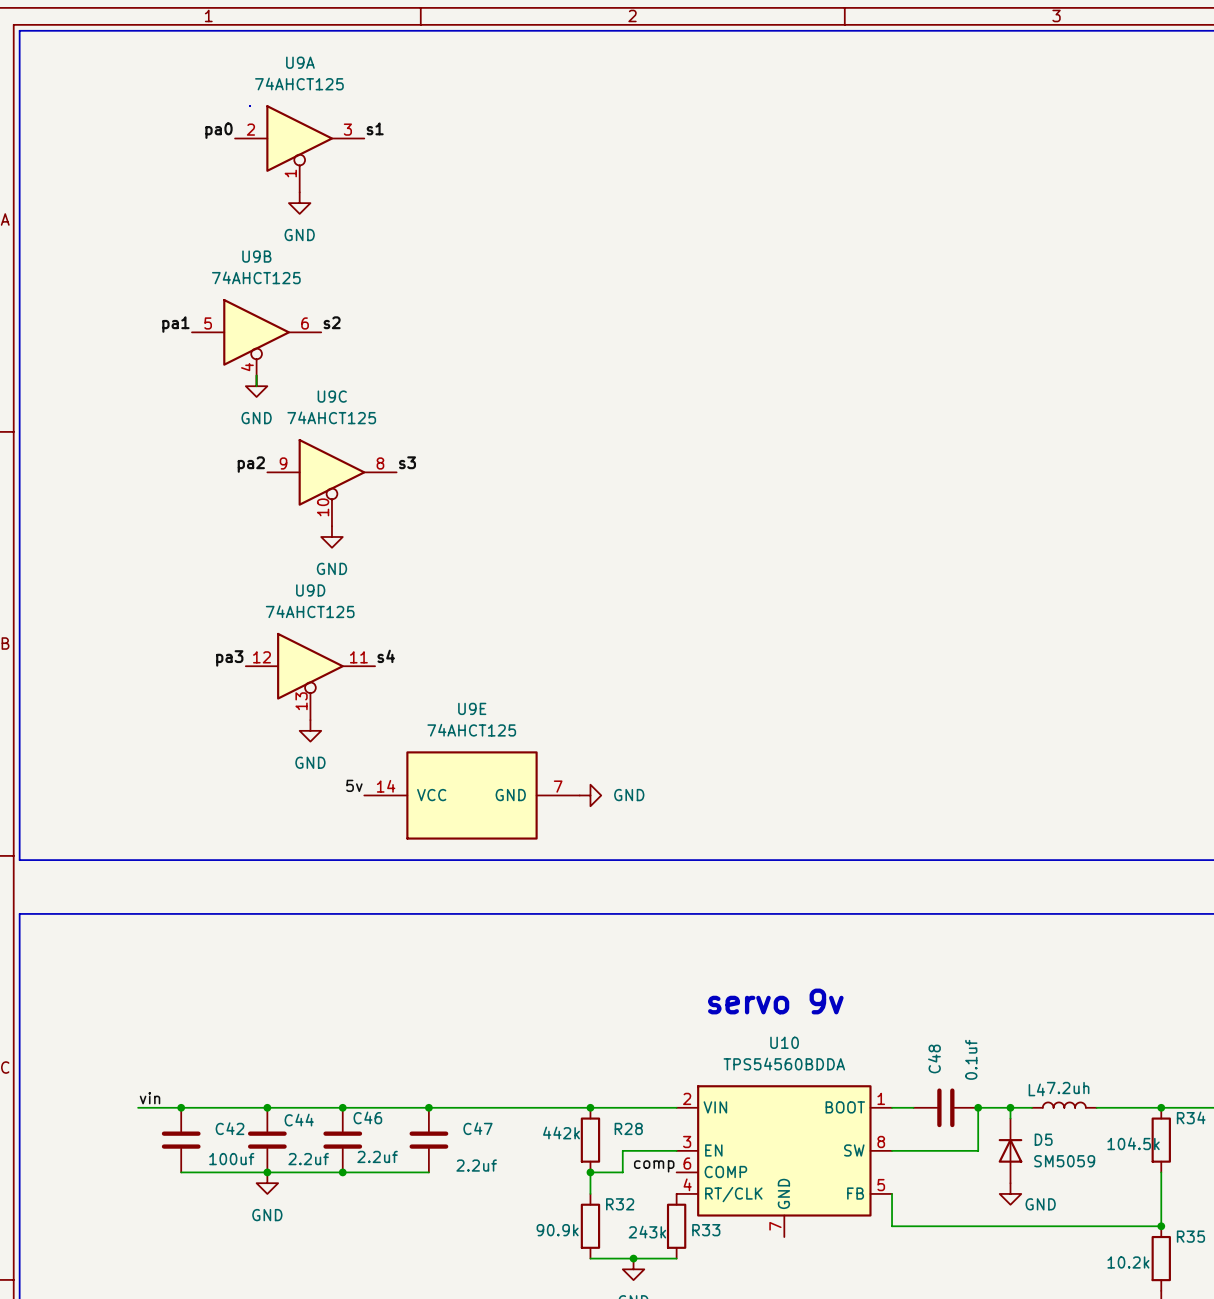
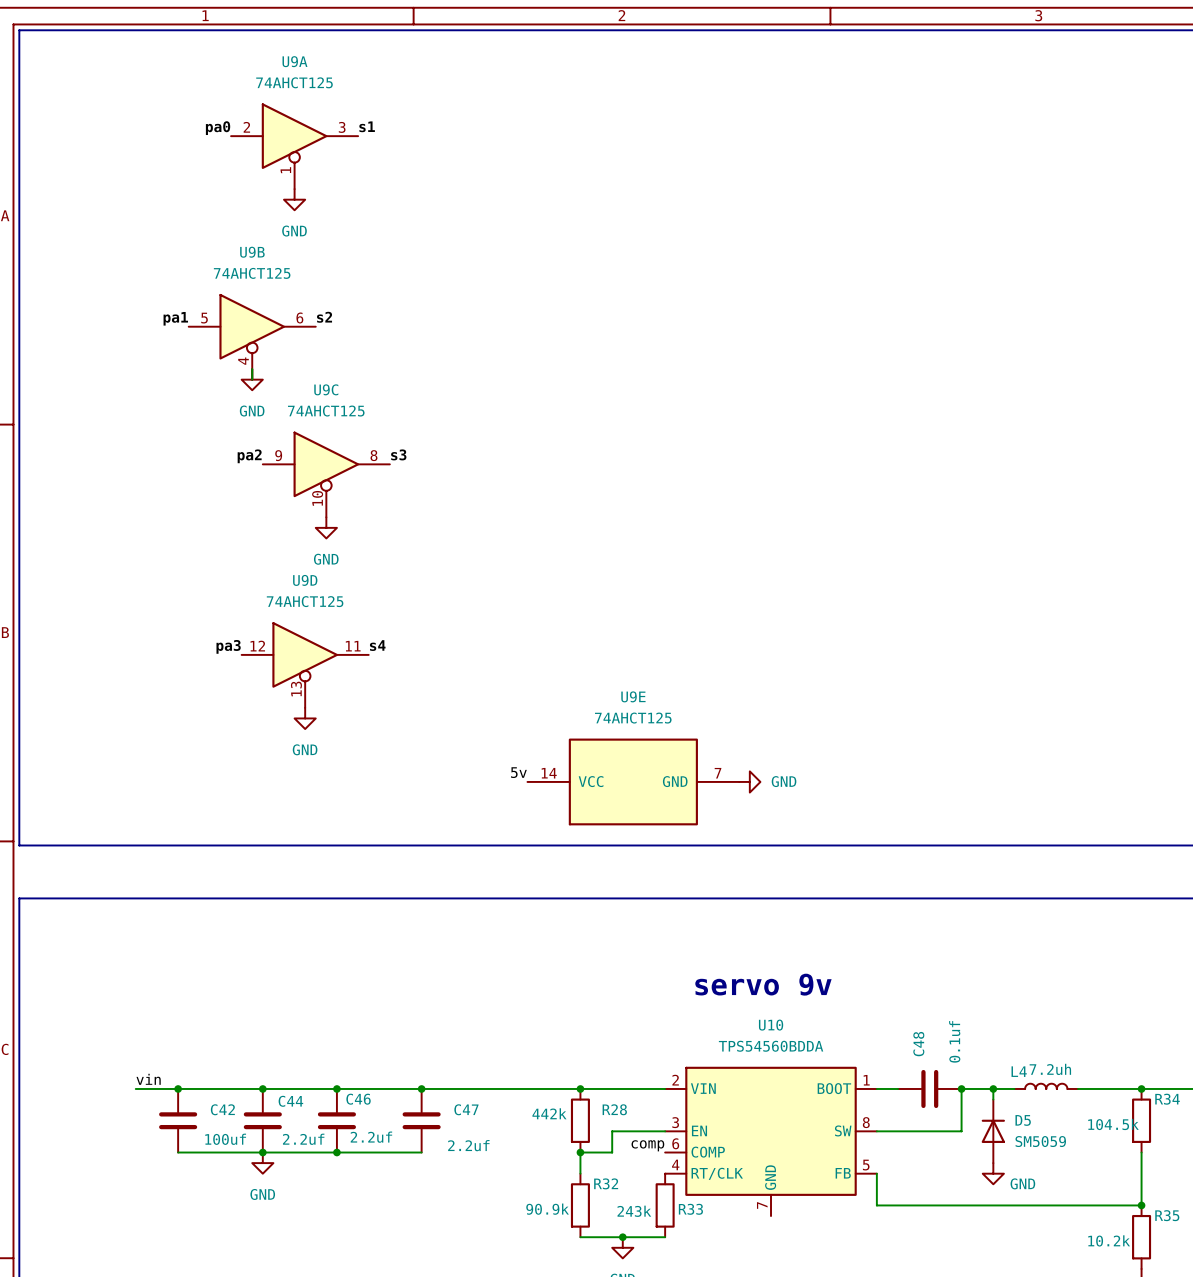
label position: 5v (354, 785) -> 5v (518, 772)
U9E position: (471, 795) -> (633, 781)
power symbol position: GND (590, 795) -> GND (749, 781)

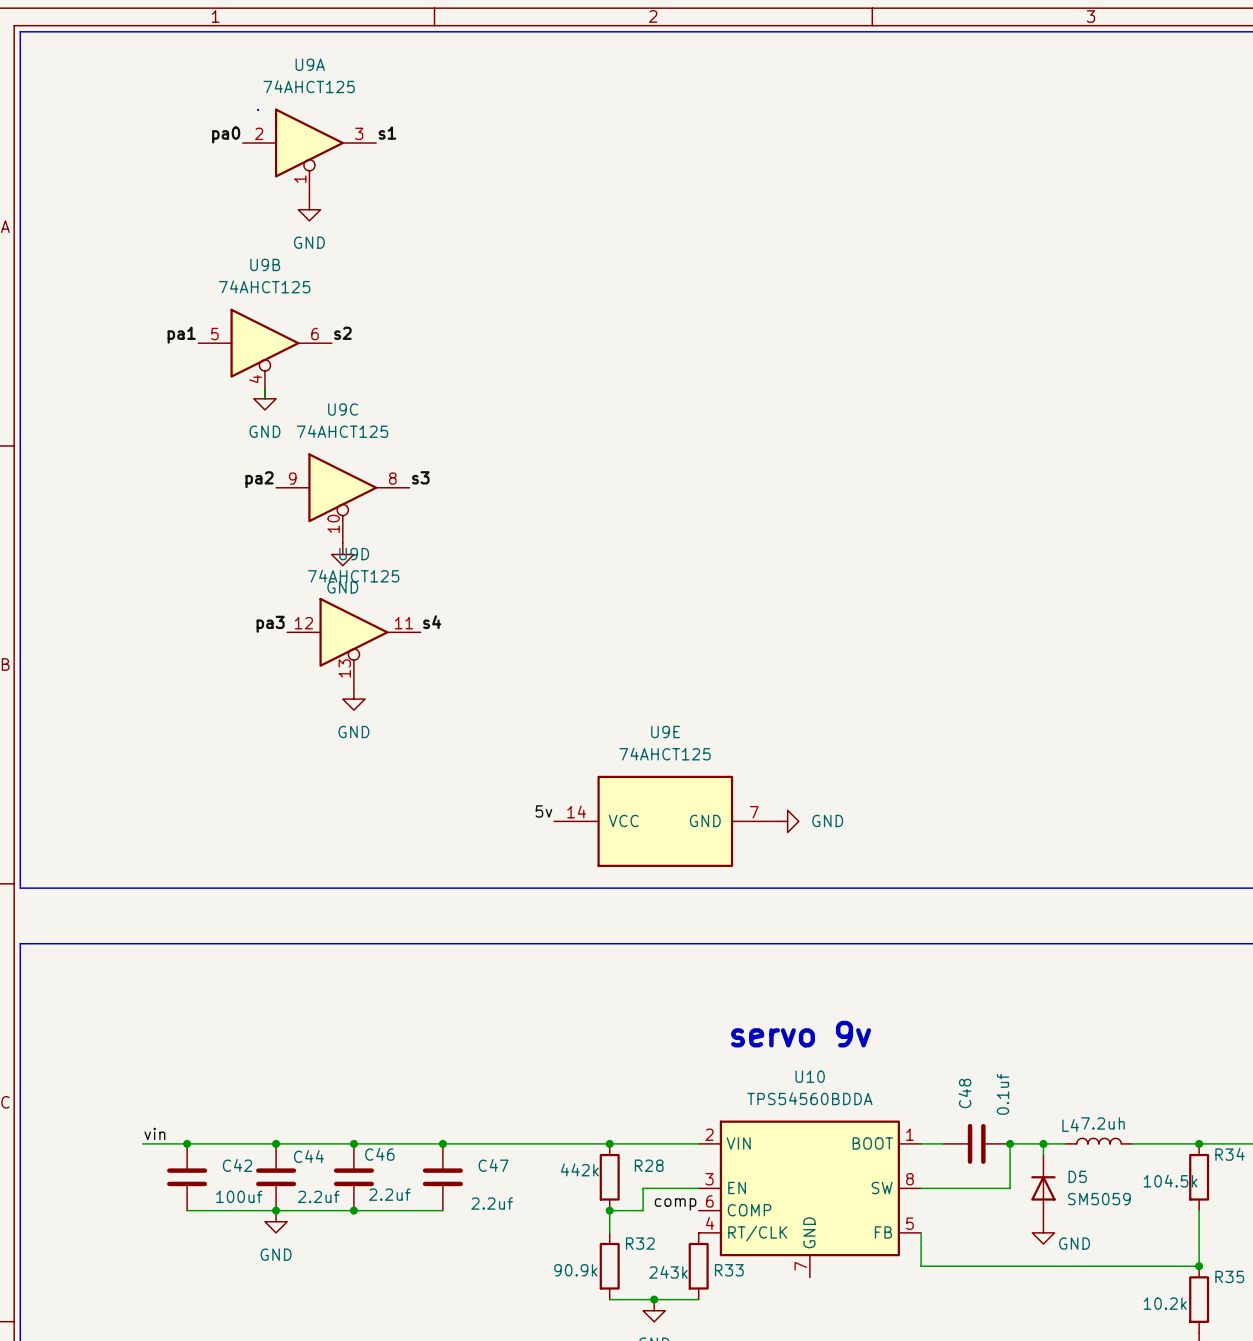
label position: s4 (377, 645) -> s4 (432, 622)
label position: pa3 (228, 646) -> pa3 (270, 624)
U9D position: (305, 664) -> (353, 642)
power symbol position: GND (305, 718) -> GND (353, 699)

